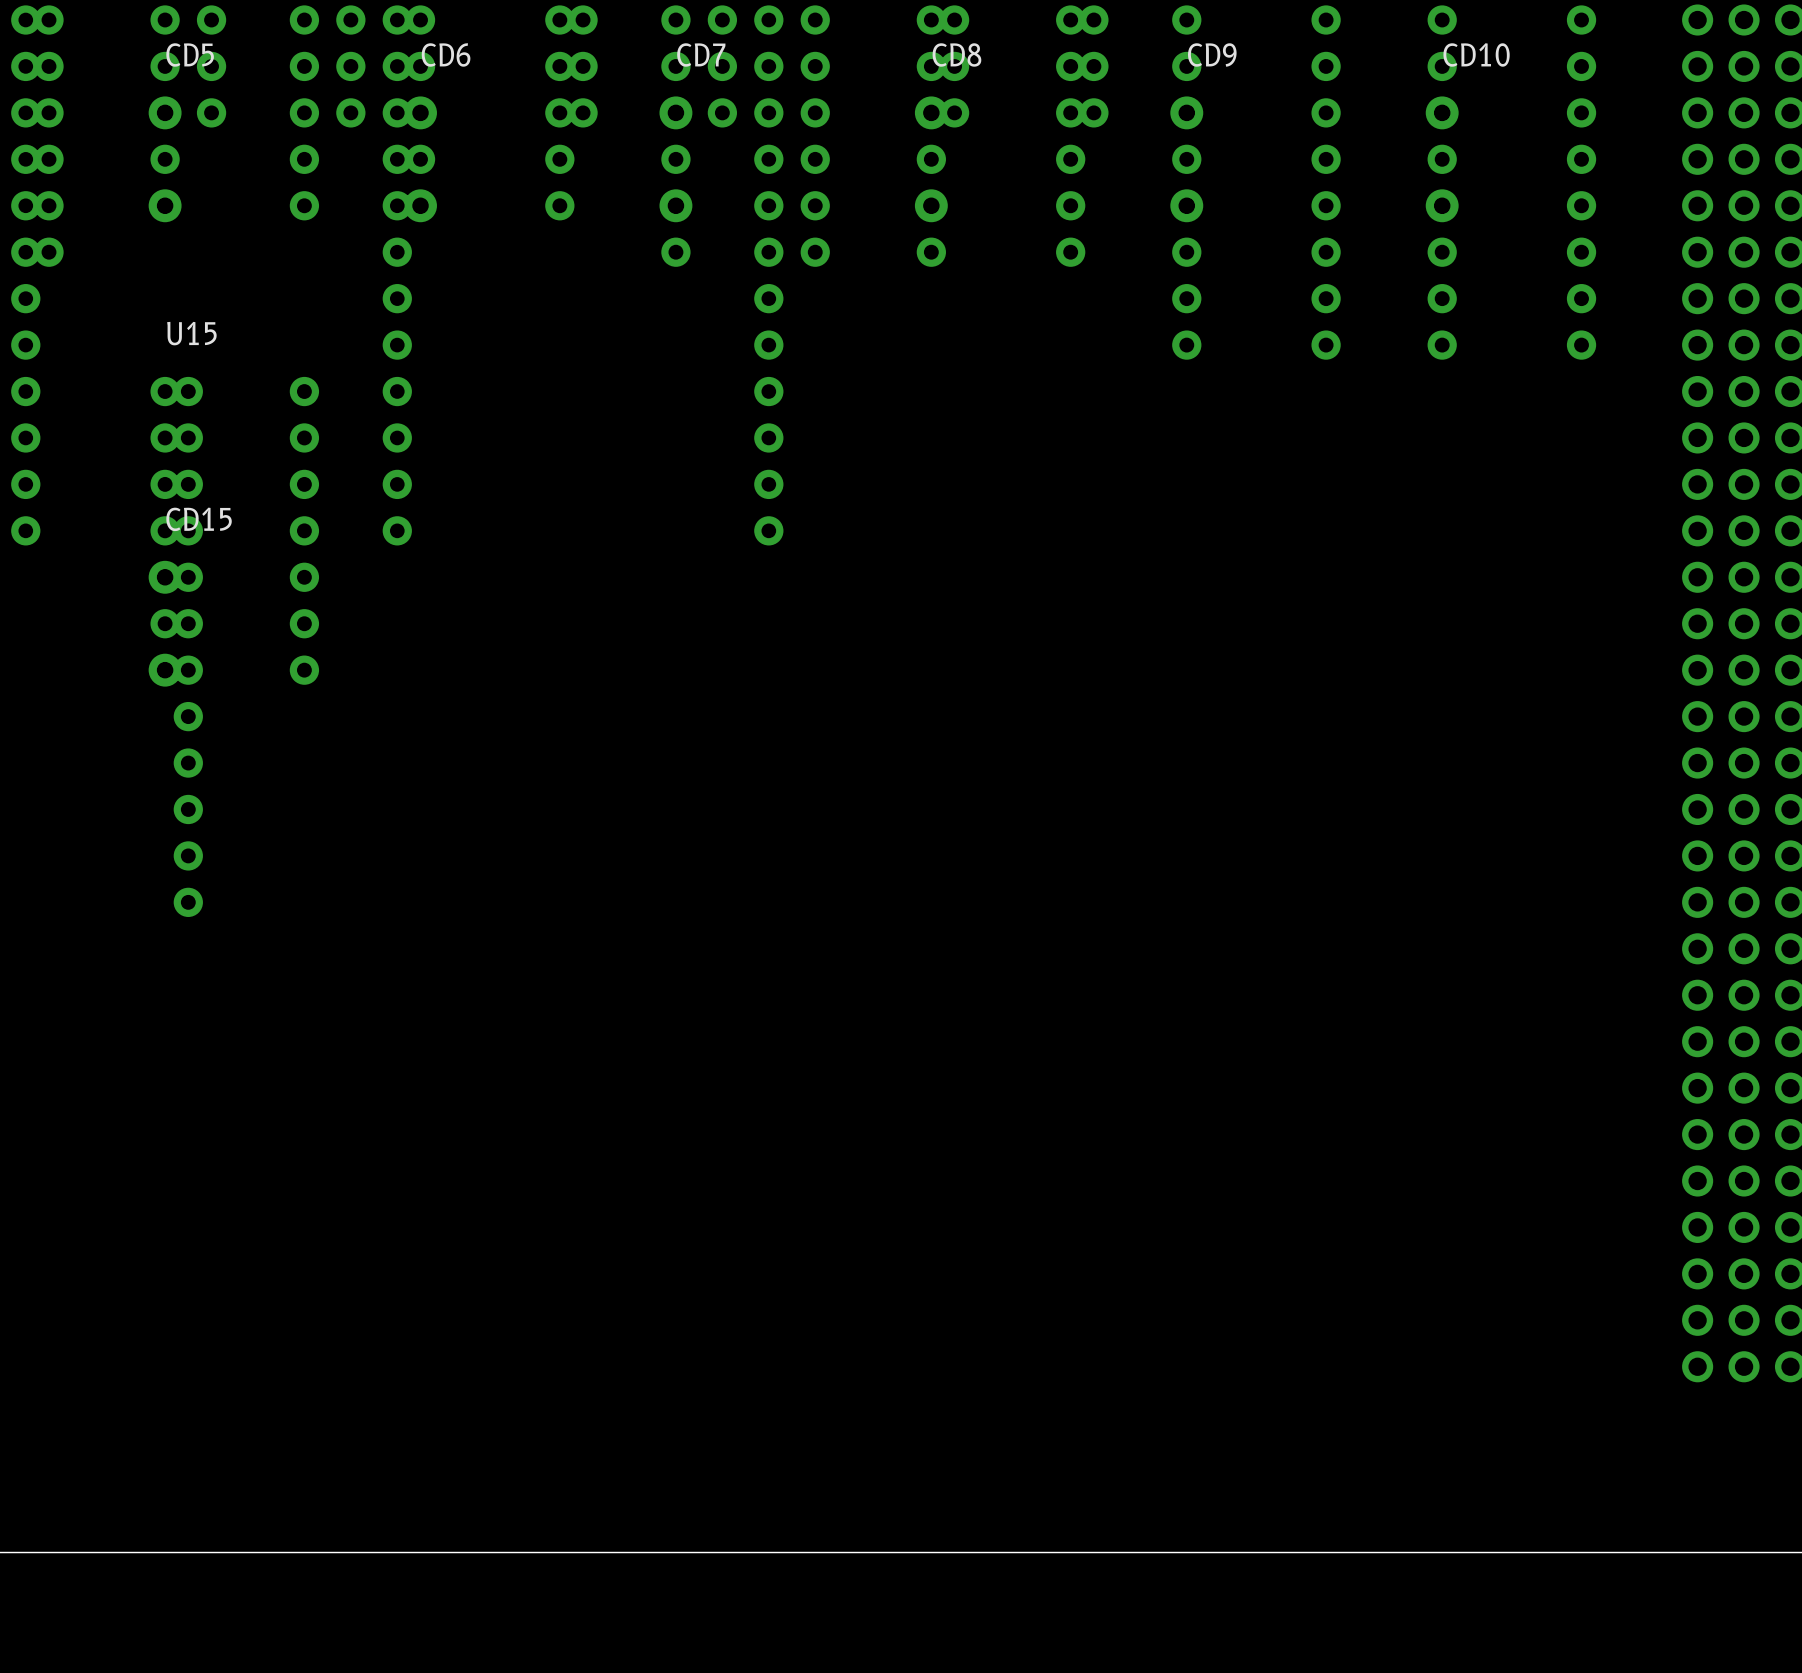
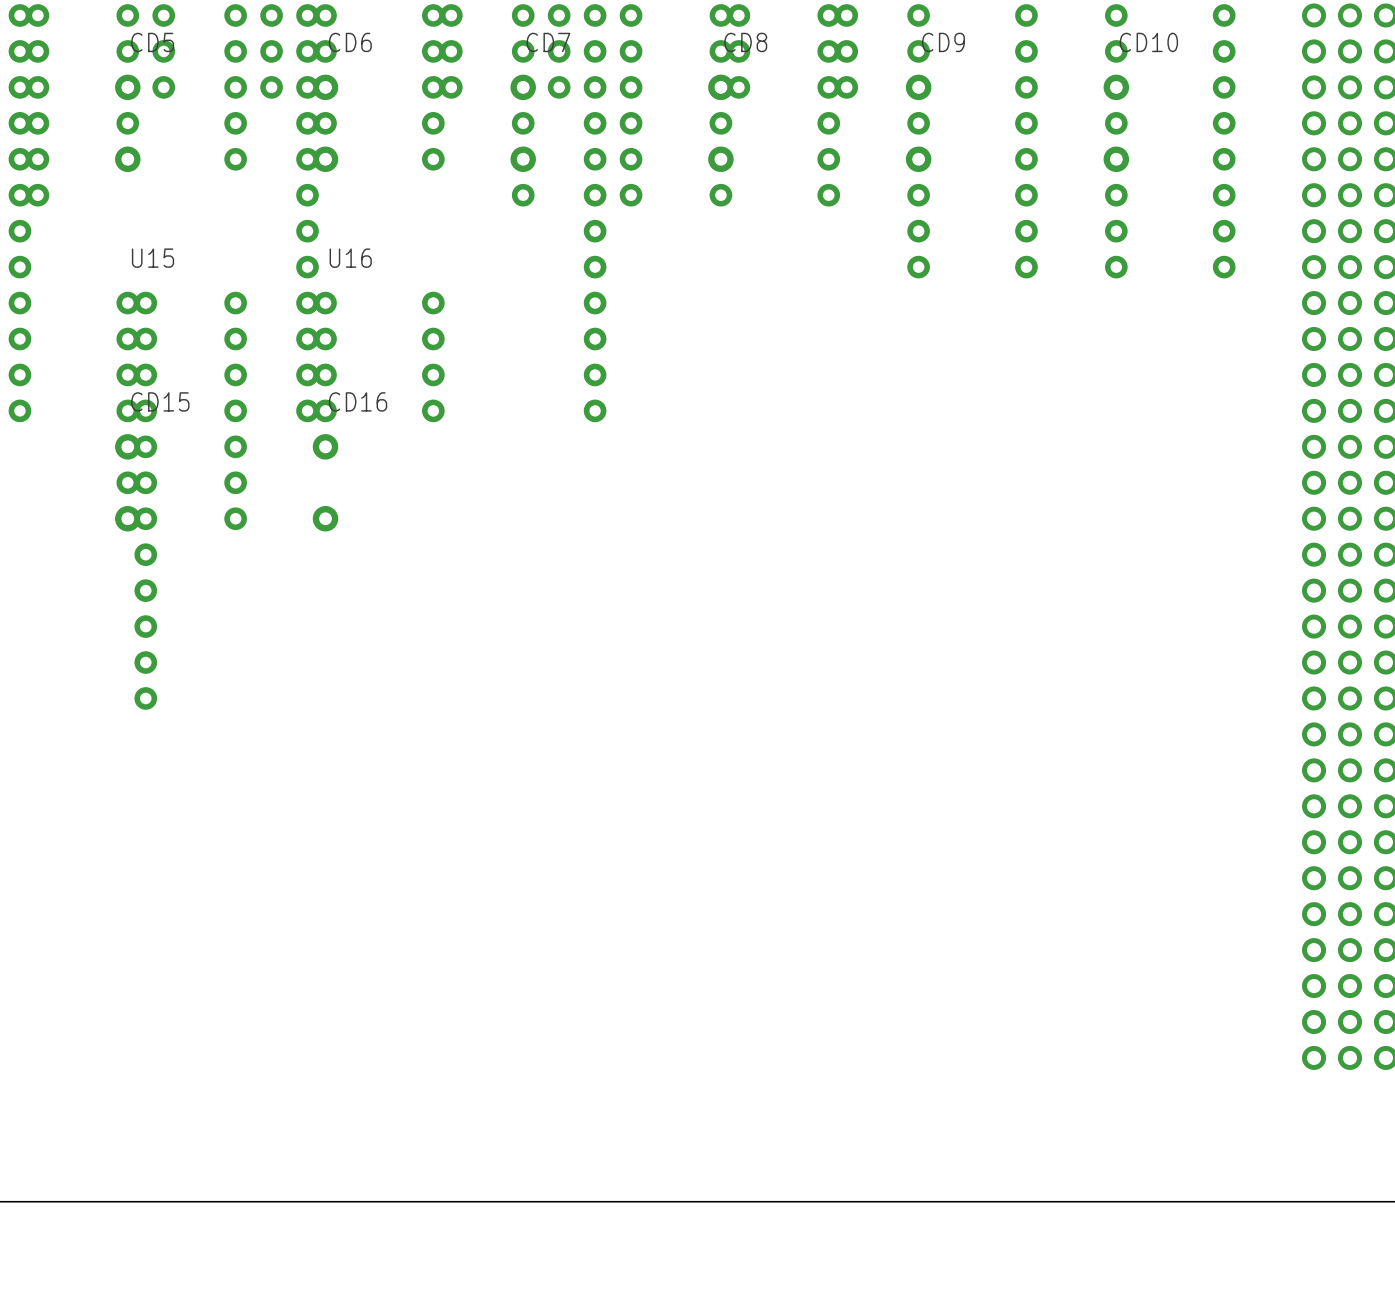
U16: none -> (379, 356)
CD16: none -> (325, 482)

